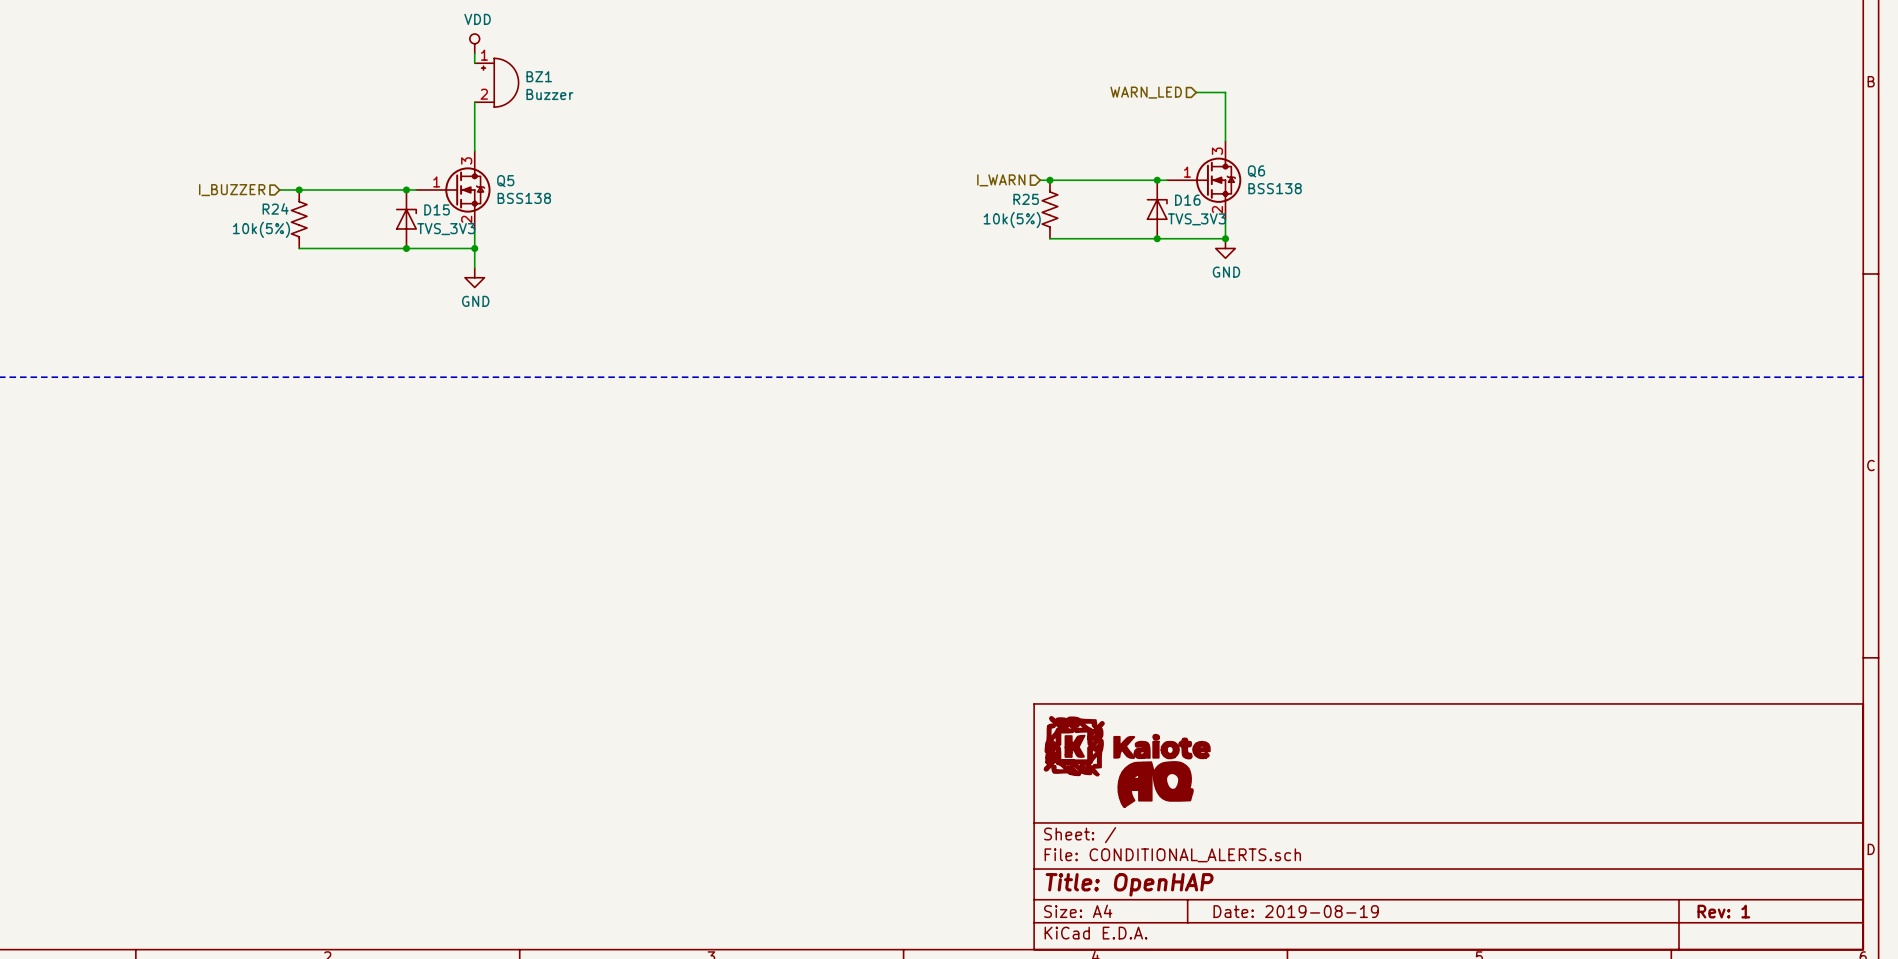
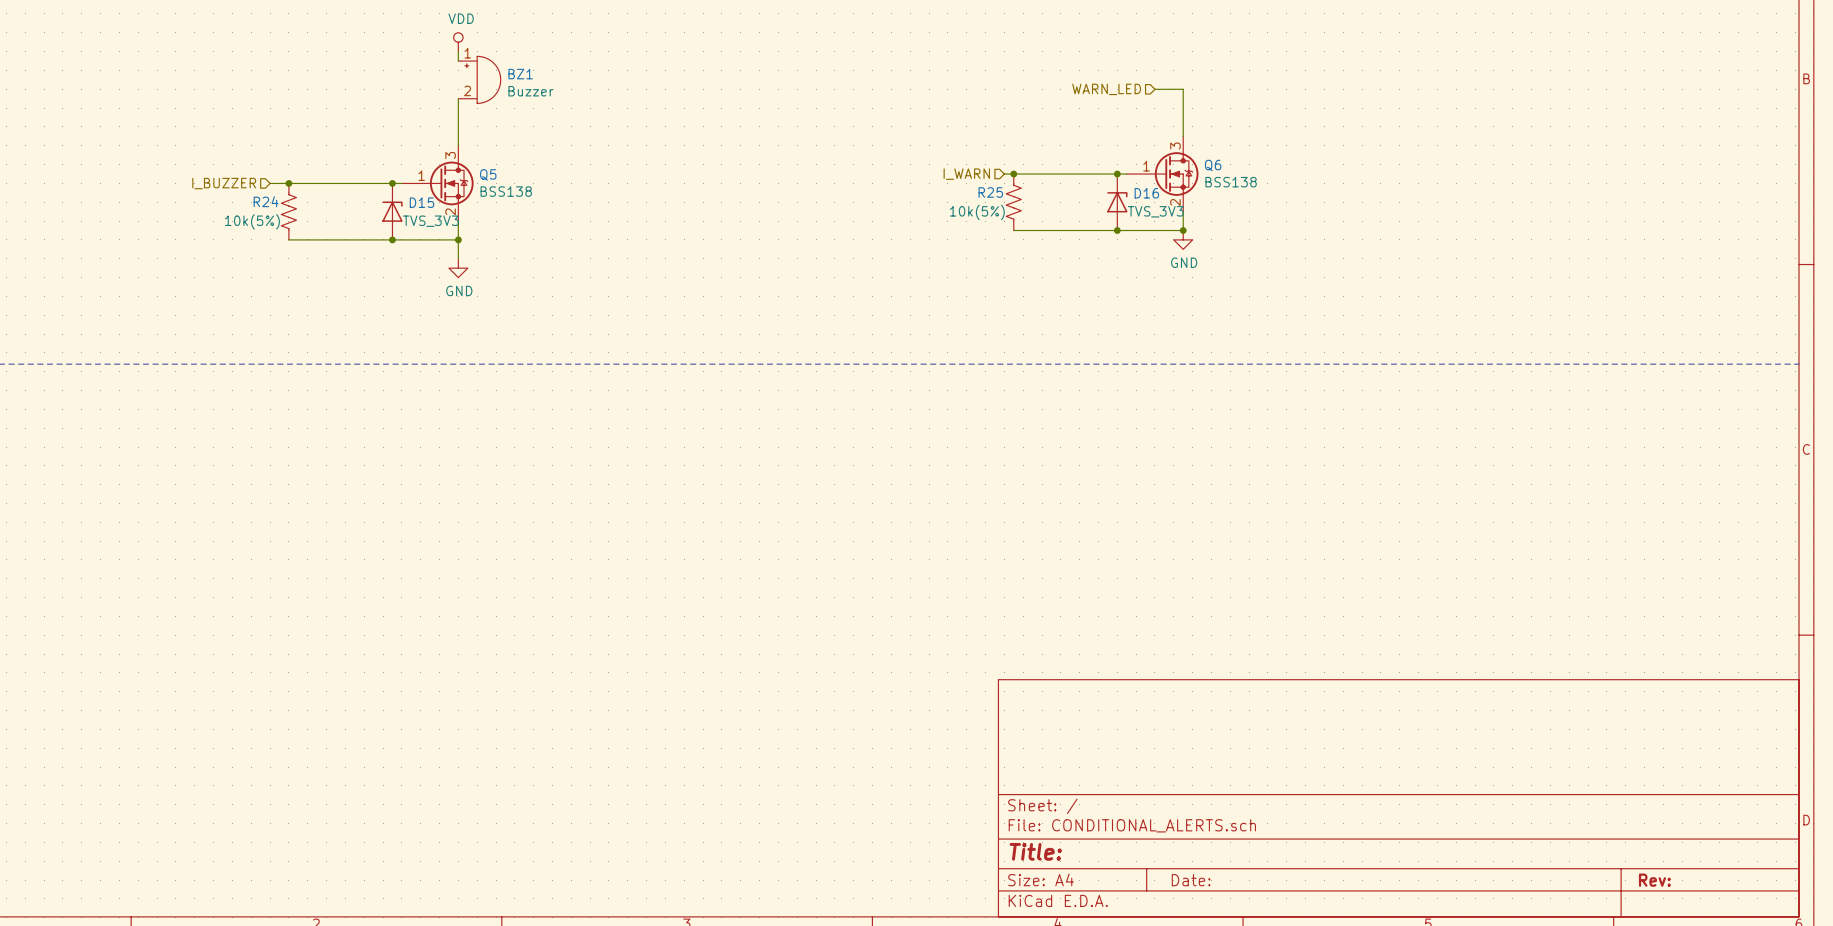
part: (1127, 746) -> none
part: (1155, 784) -> none
title block: Title: OpenHAP (1129, 884) -> Title: (1035, 851)
title block: Date: 2019-08-19 (1296, 911) -> Date: (1191, 880)
title block: Rev: 1 (1723, 911) -> Rev: (1654, 880)

